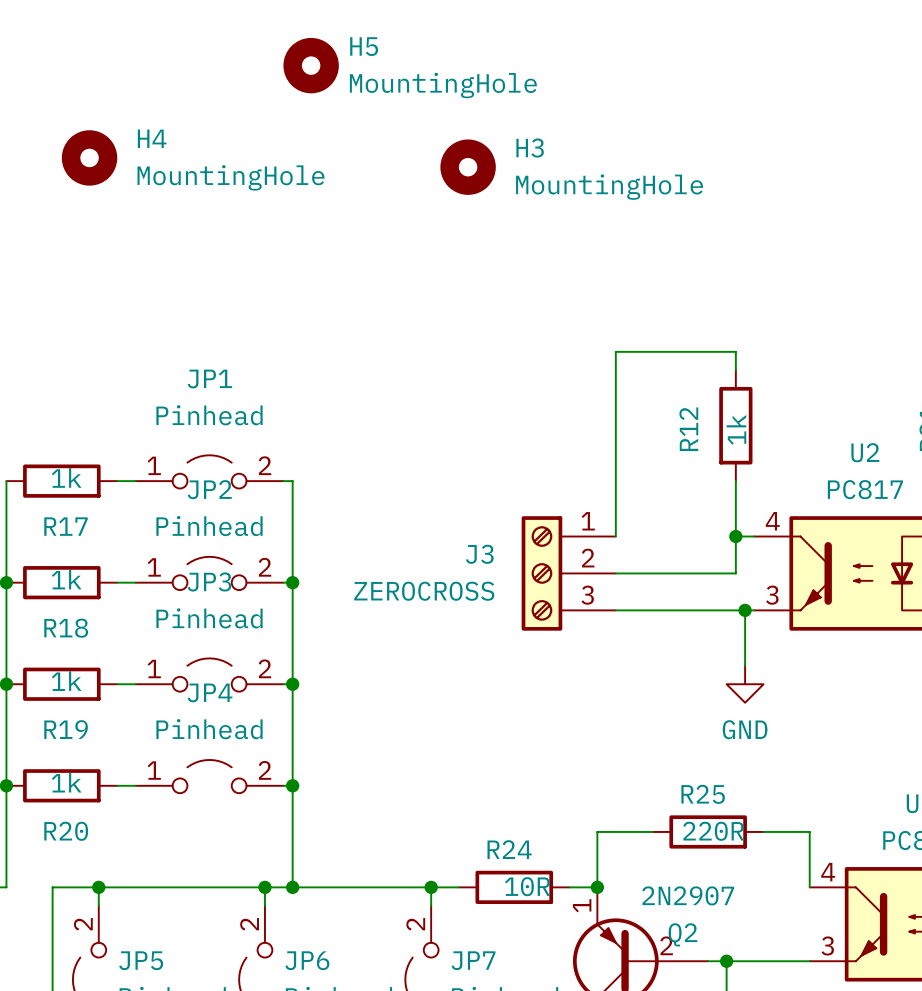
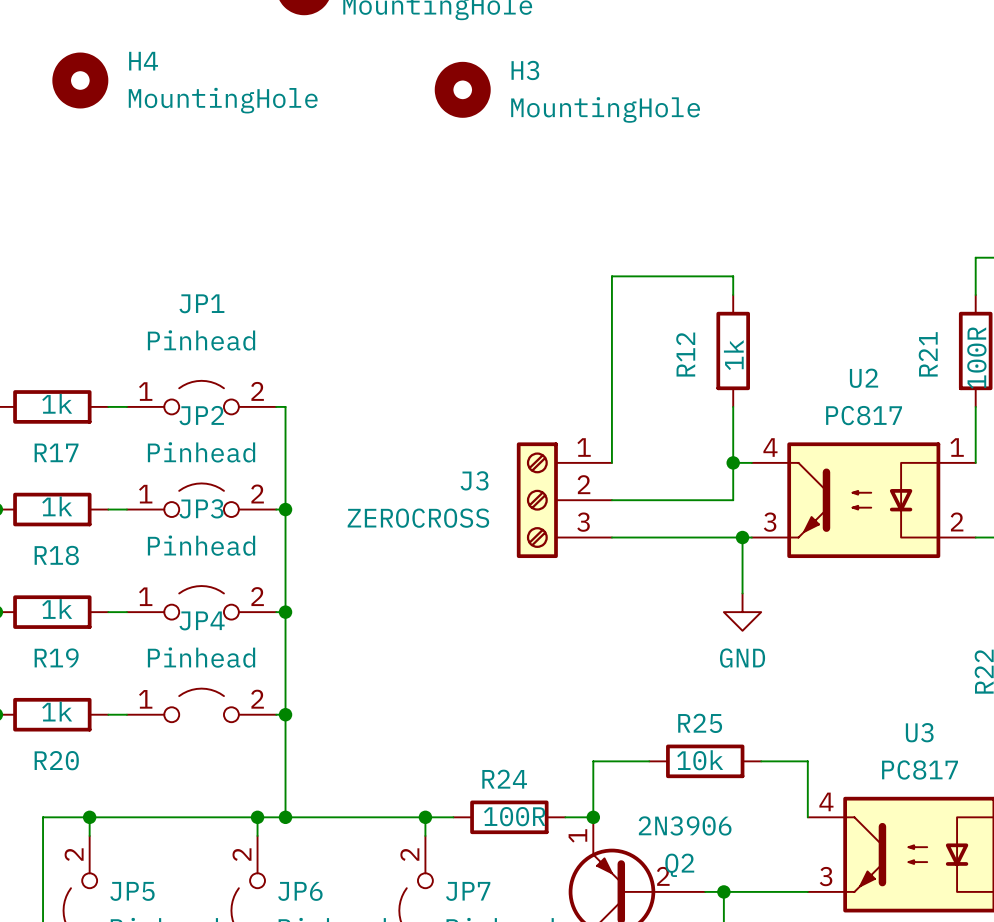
R25 value: 220R (713, 831) -> 10k (700, 760)
R24 value: 10R (527, 886) -> 100R (514, 816)
Q2 value: 2N2907 (688, 895) -> 2N3906 (685, 825)

